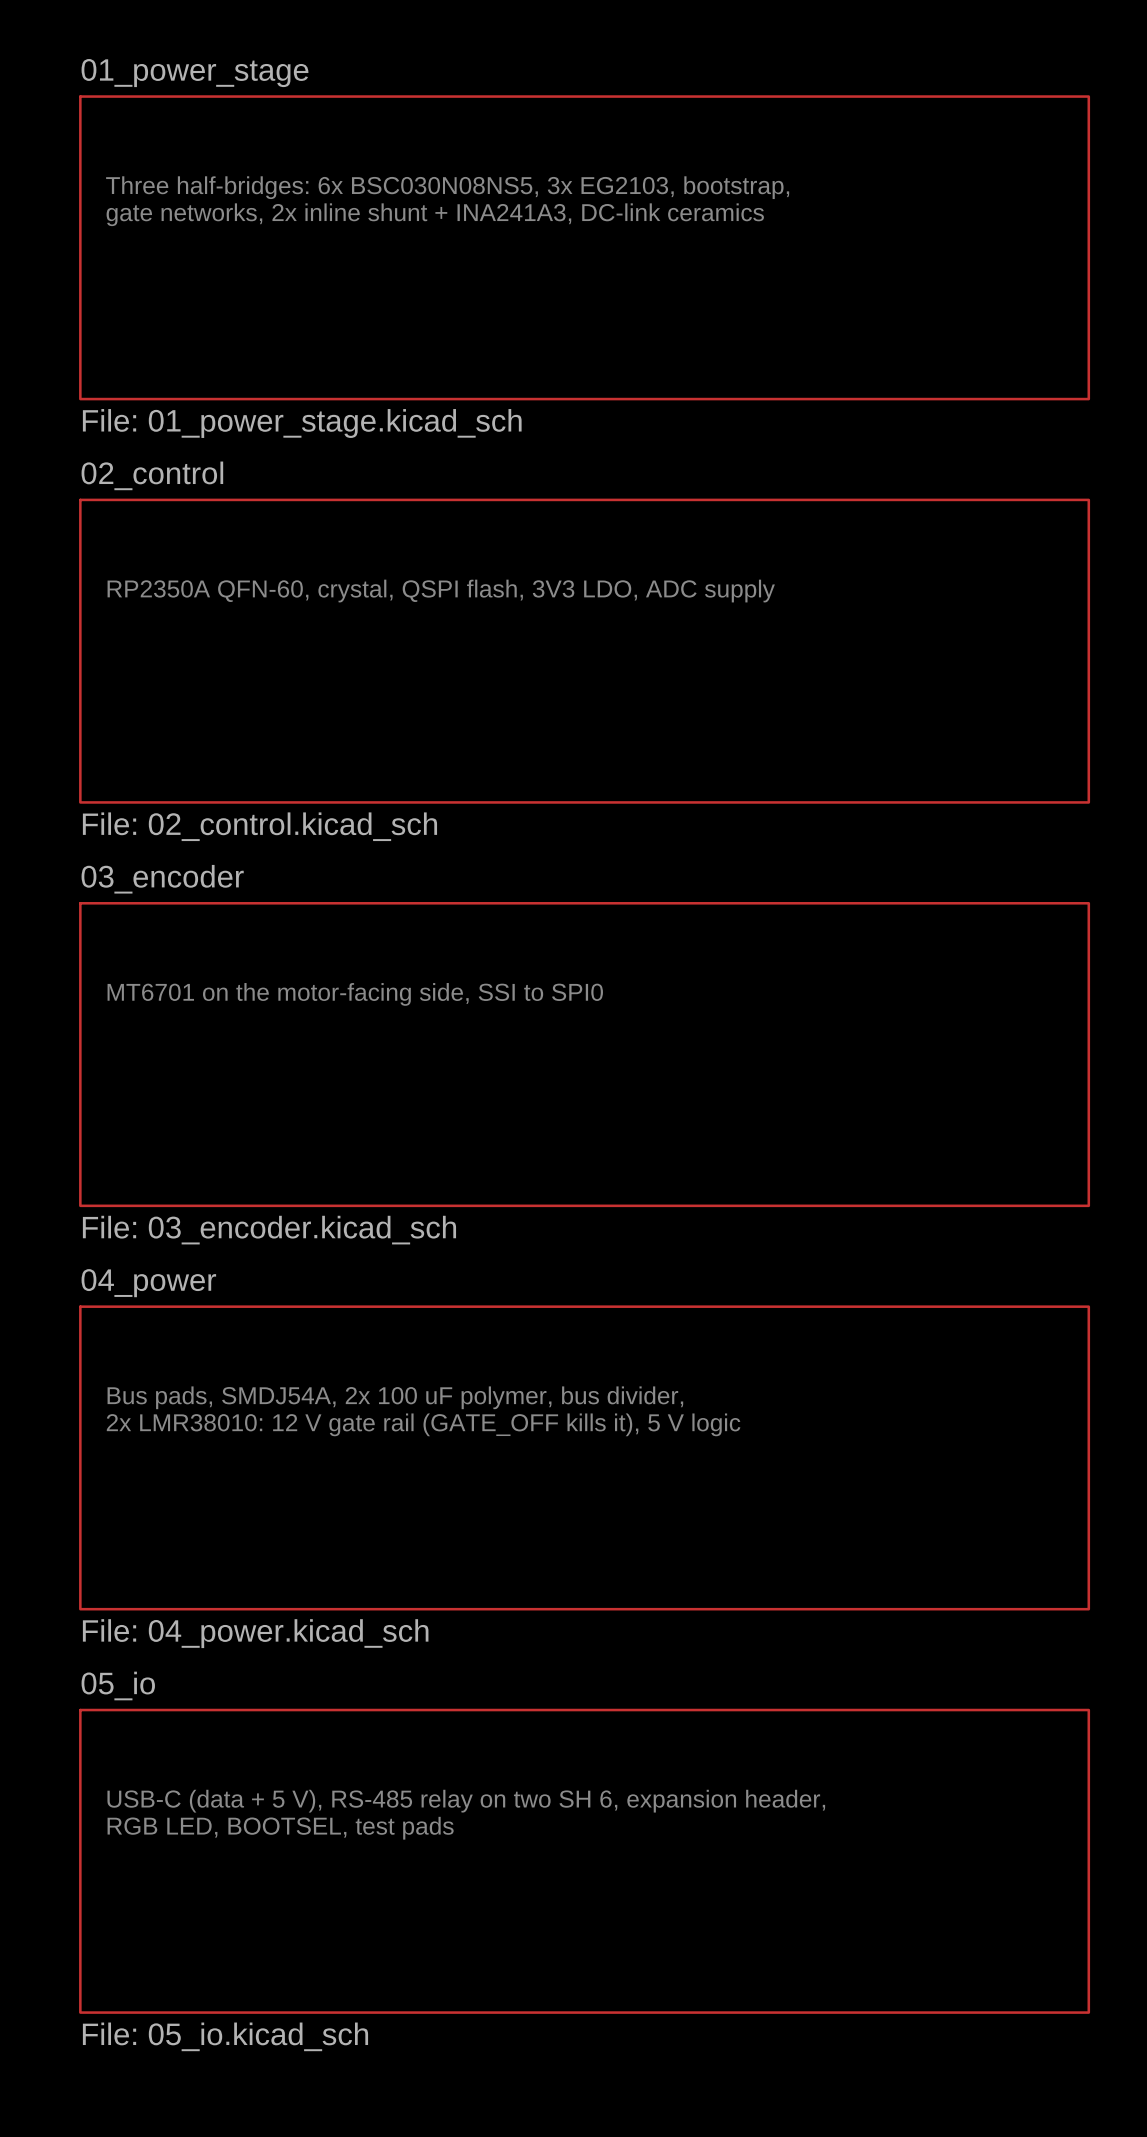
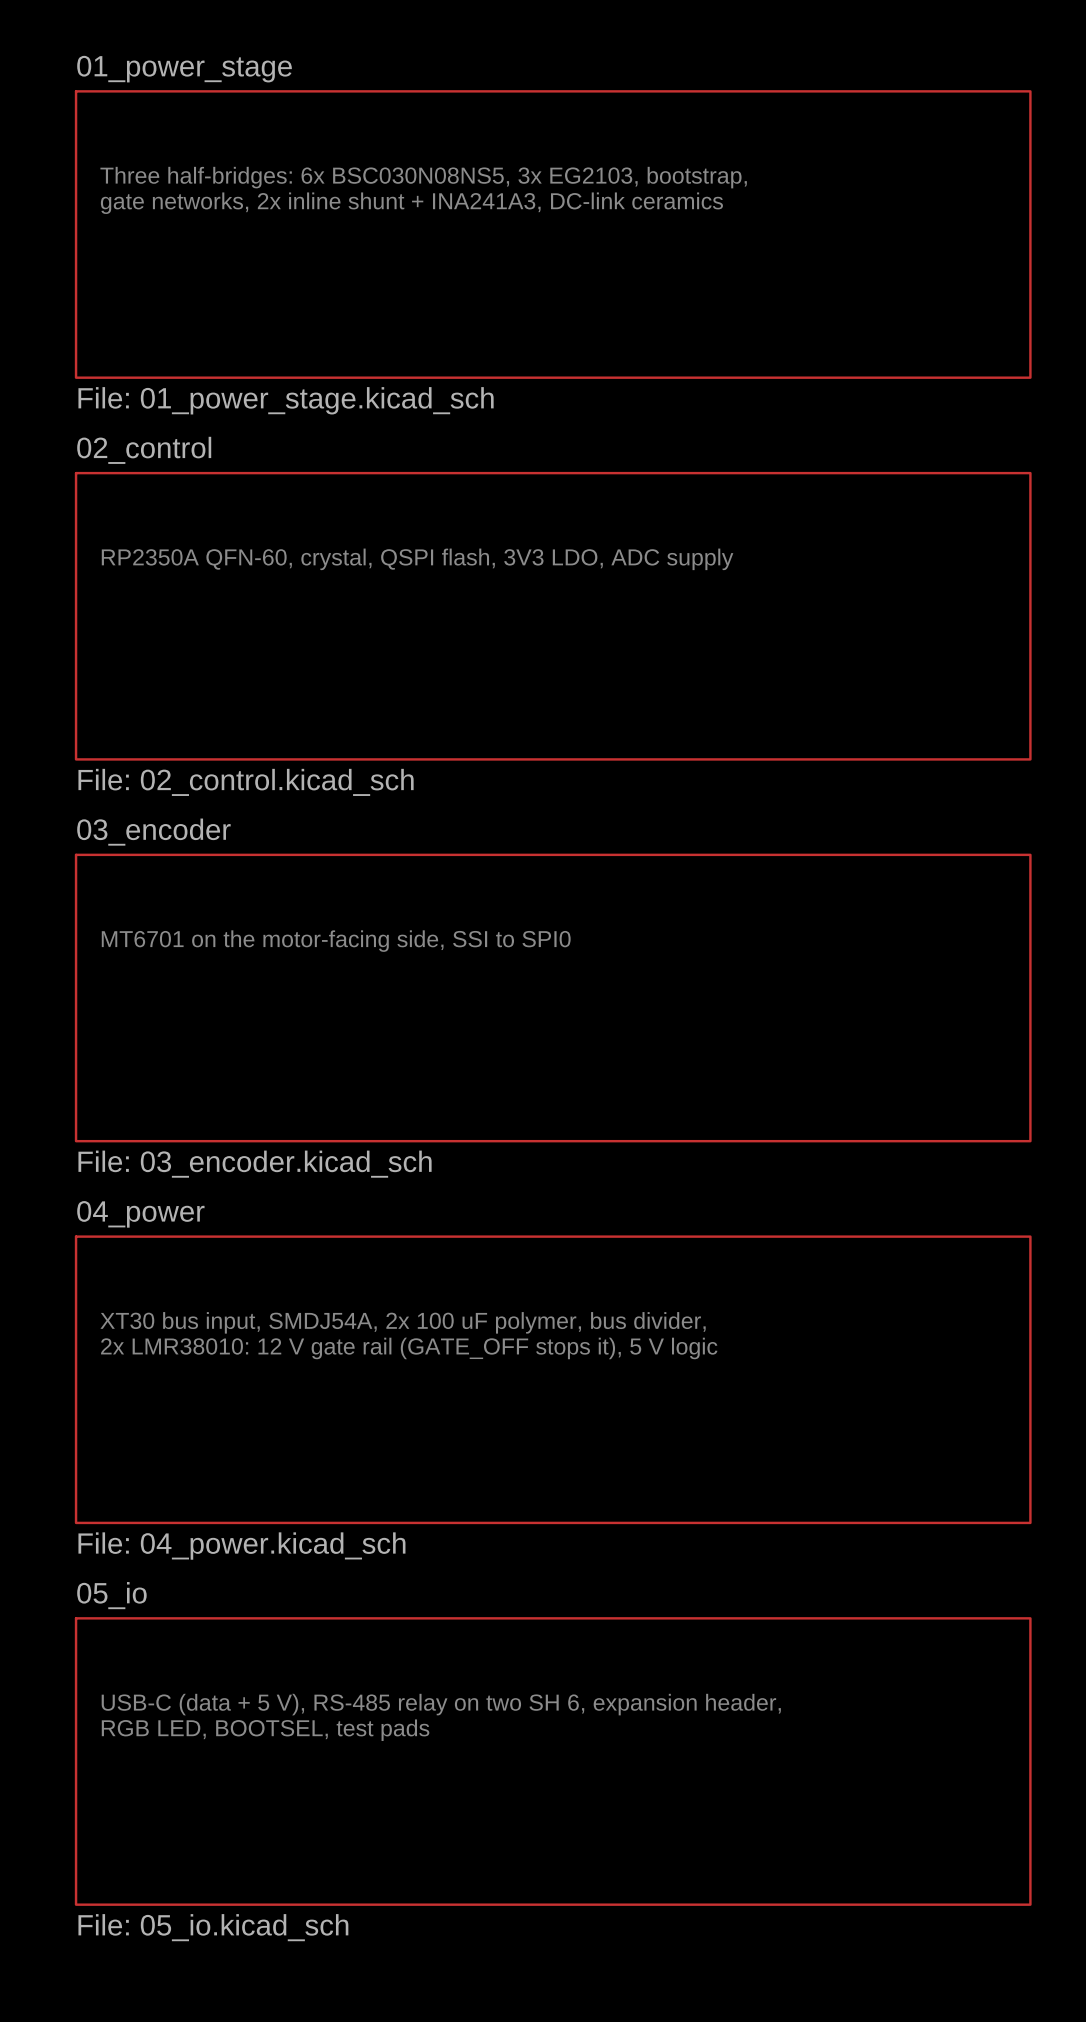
text: Bus pads, SMDJ54A, 2x 100 uF polymer, bus divider, (395, 1397) -> XT30 bus input, SMDJ54A, 2x 100 uF polymer, bus divider, (403, 1322)
text: 2x LMR38010: 12 V gate rail (GATE_OFF kills it), 5 V logic (423, 1424) -> 2x LMR38010: 12 V gate rail (GATE_OFF stops it), 5 V logic (409, 1348)

